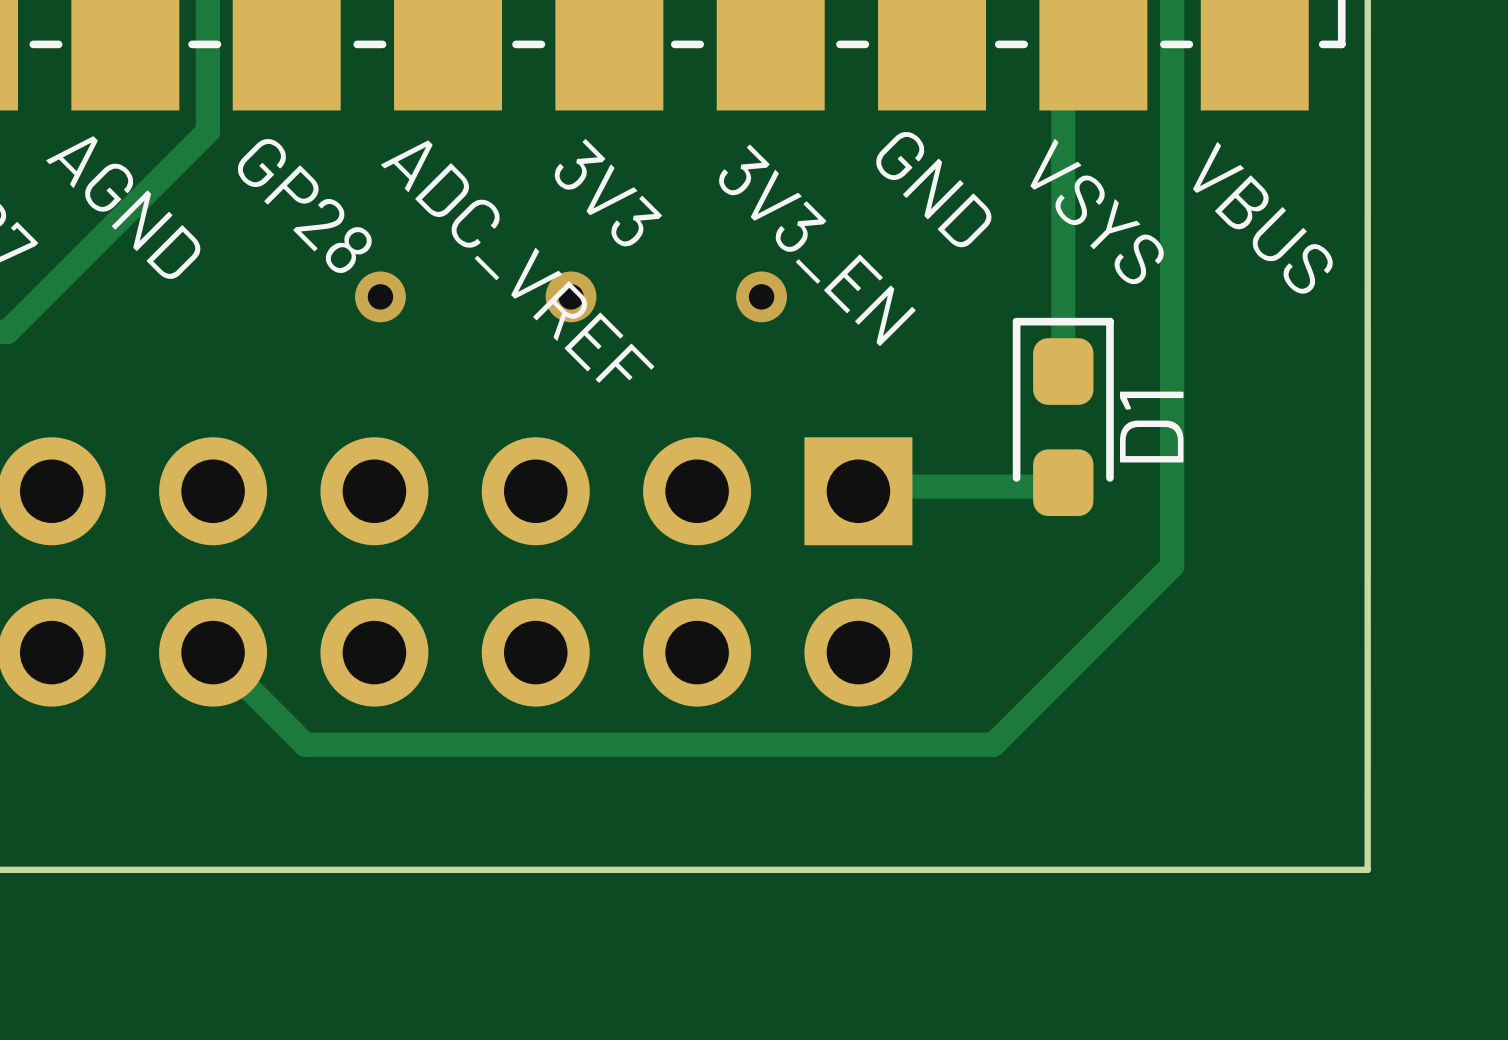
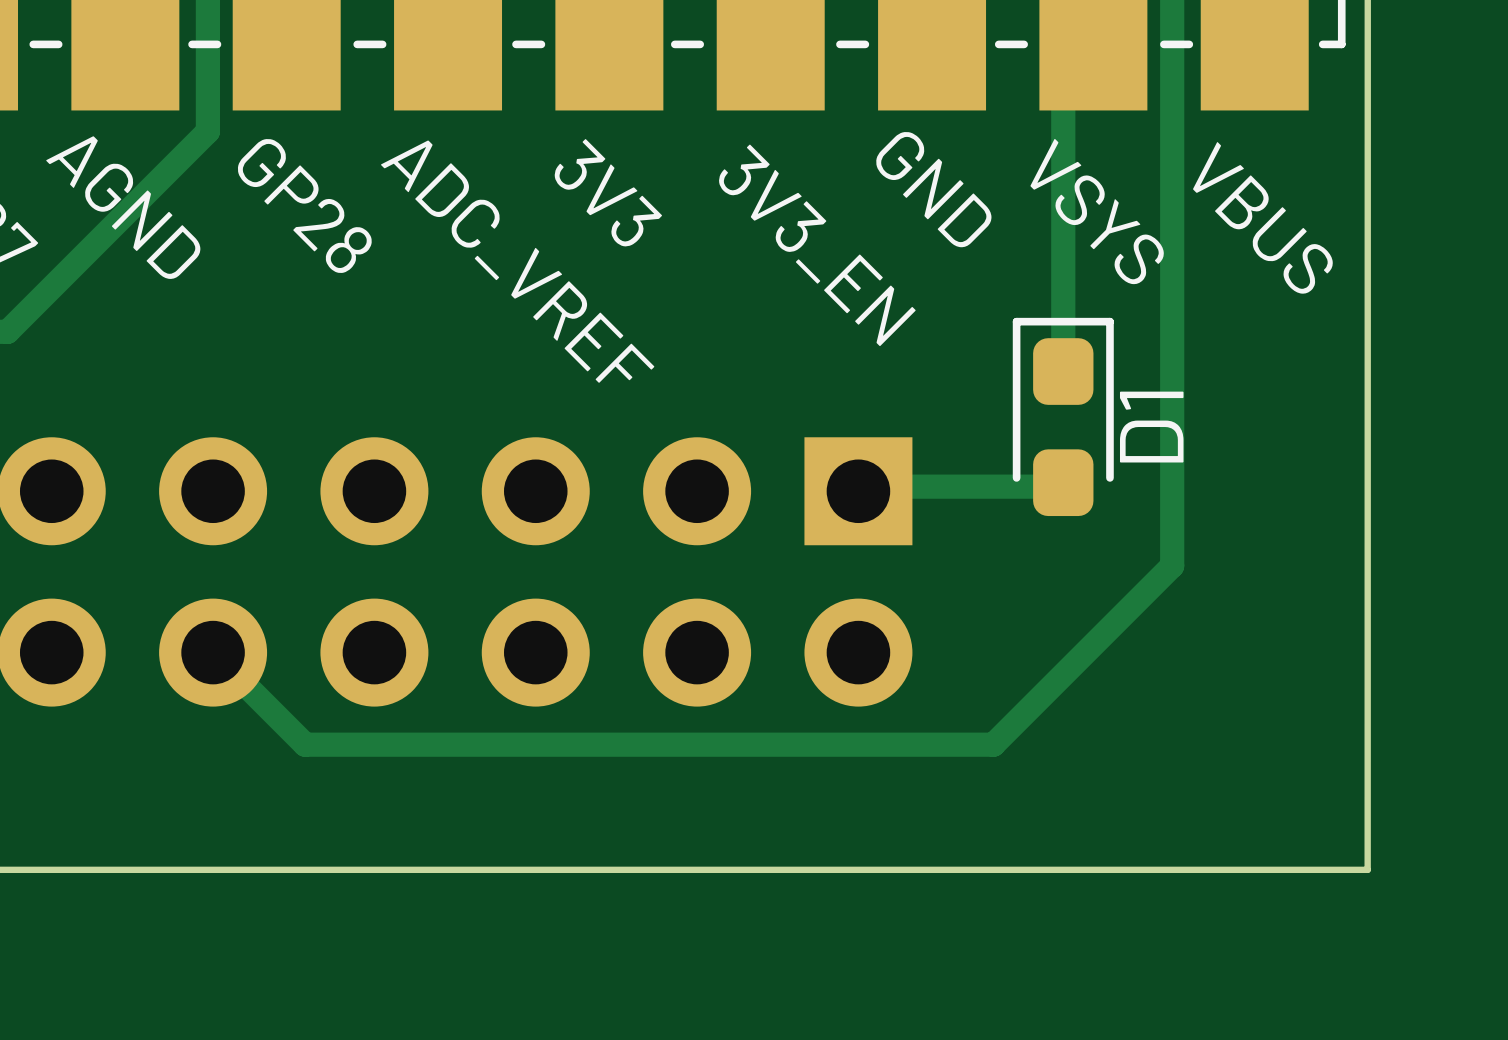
via: (380, 296) -> none
via: (571, 296) -> none
via: (761, 296) -> none

